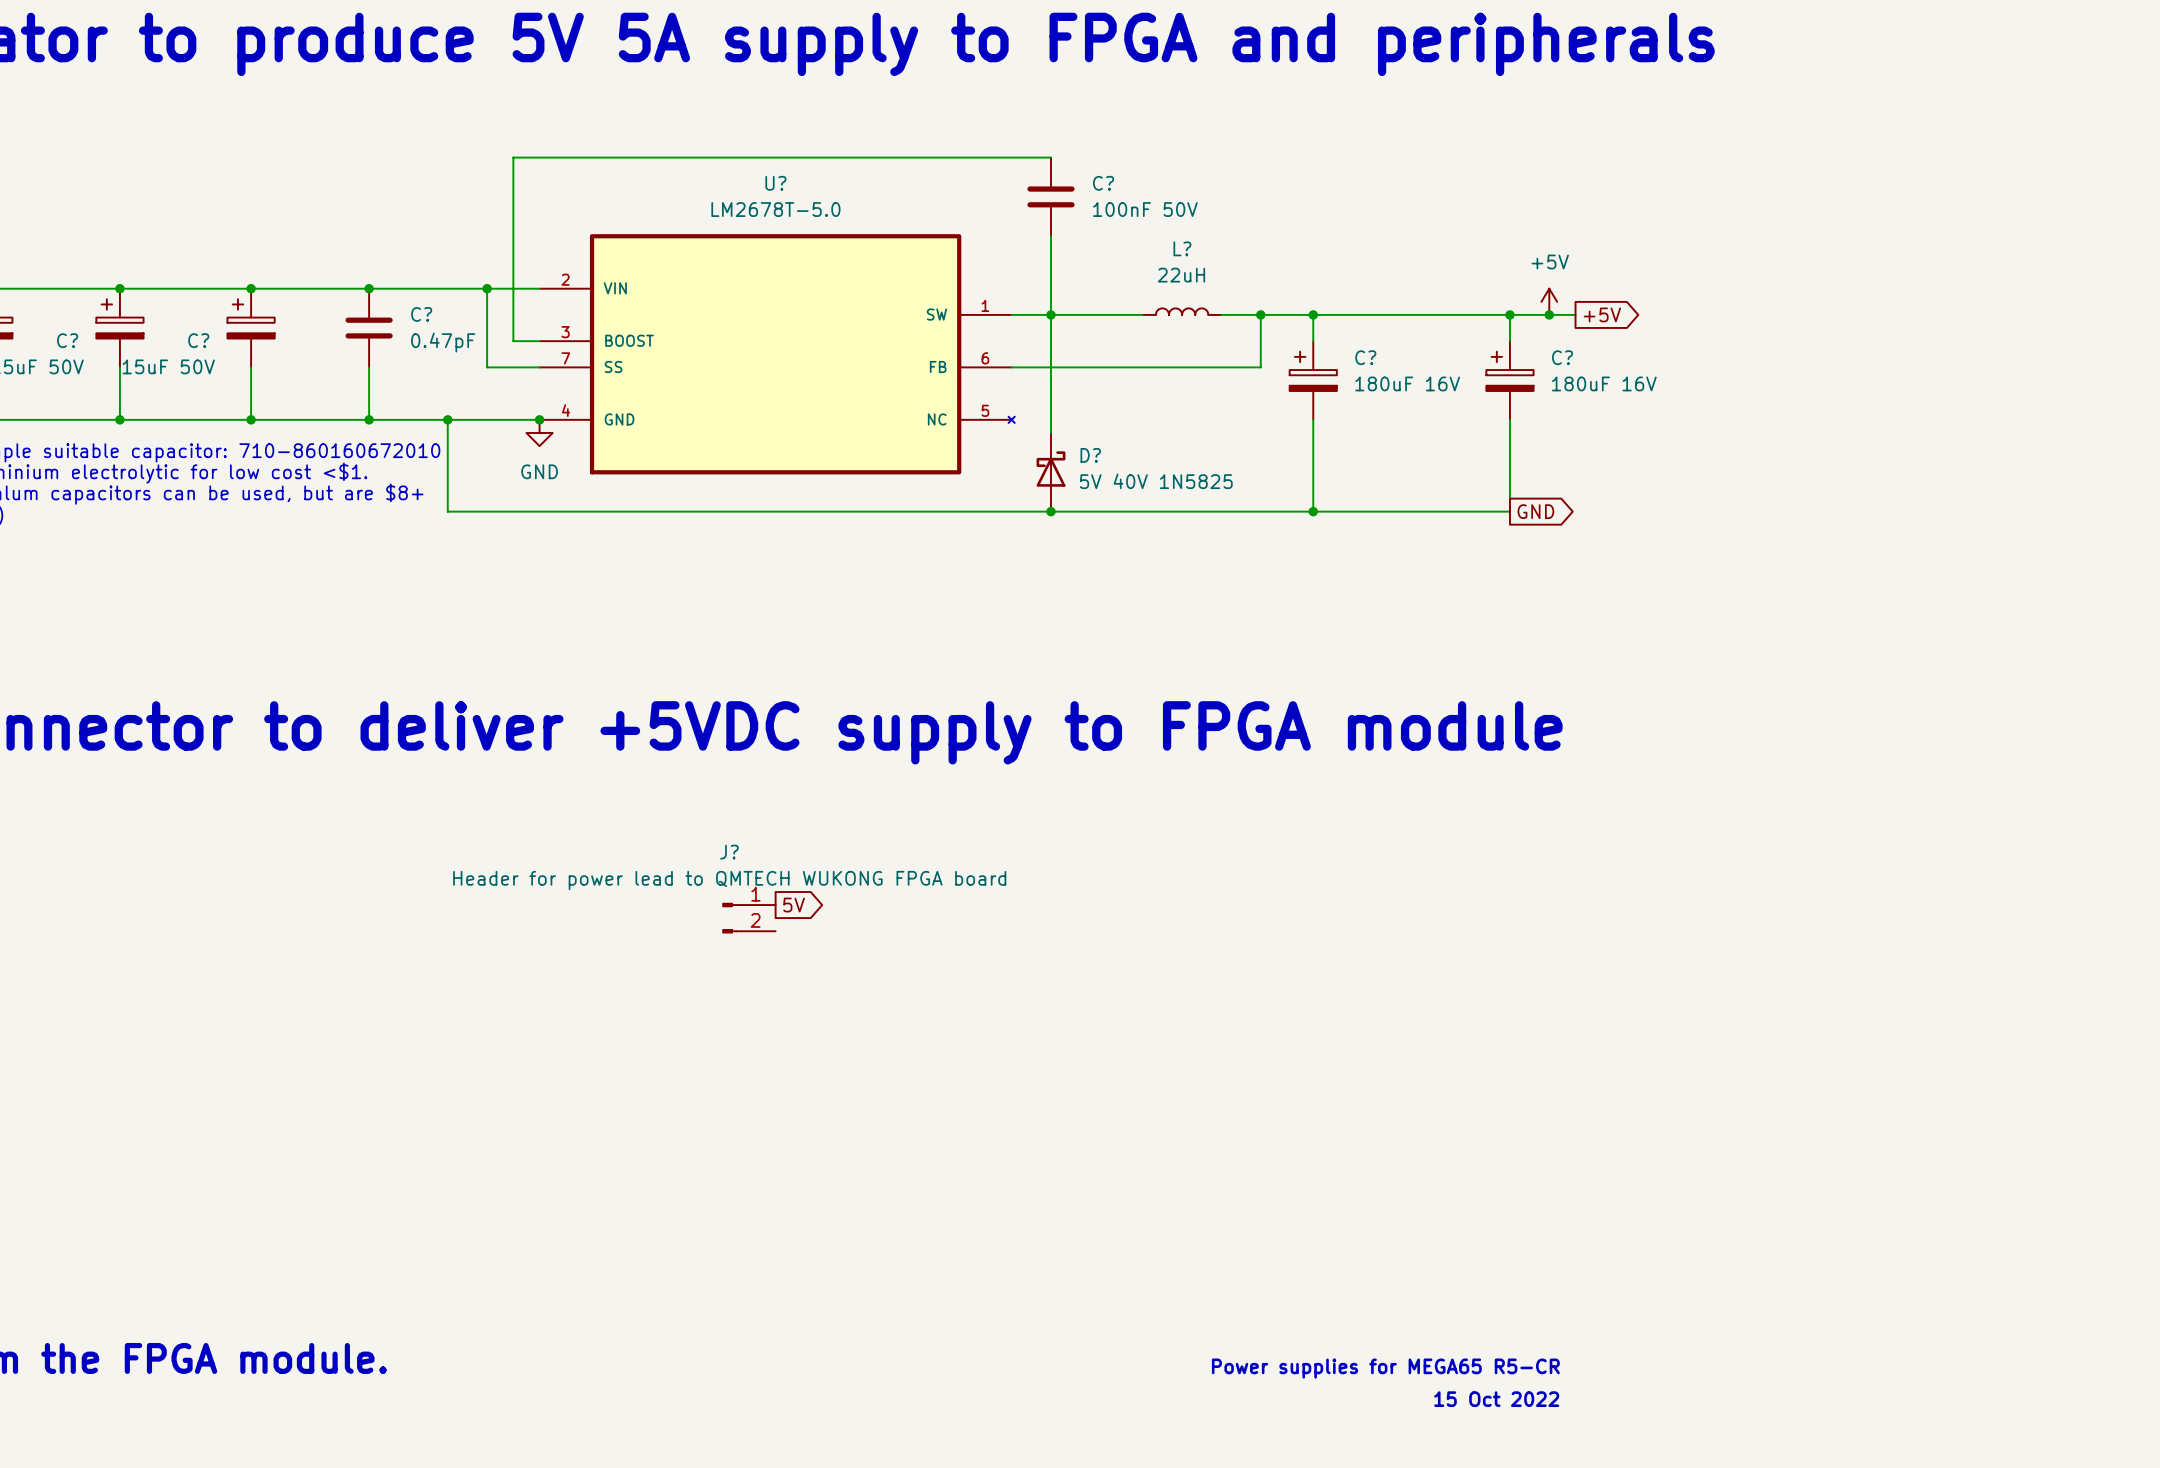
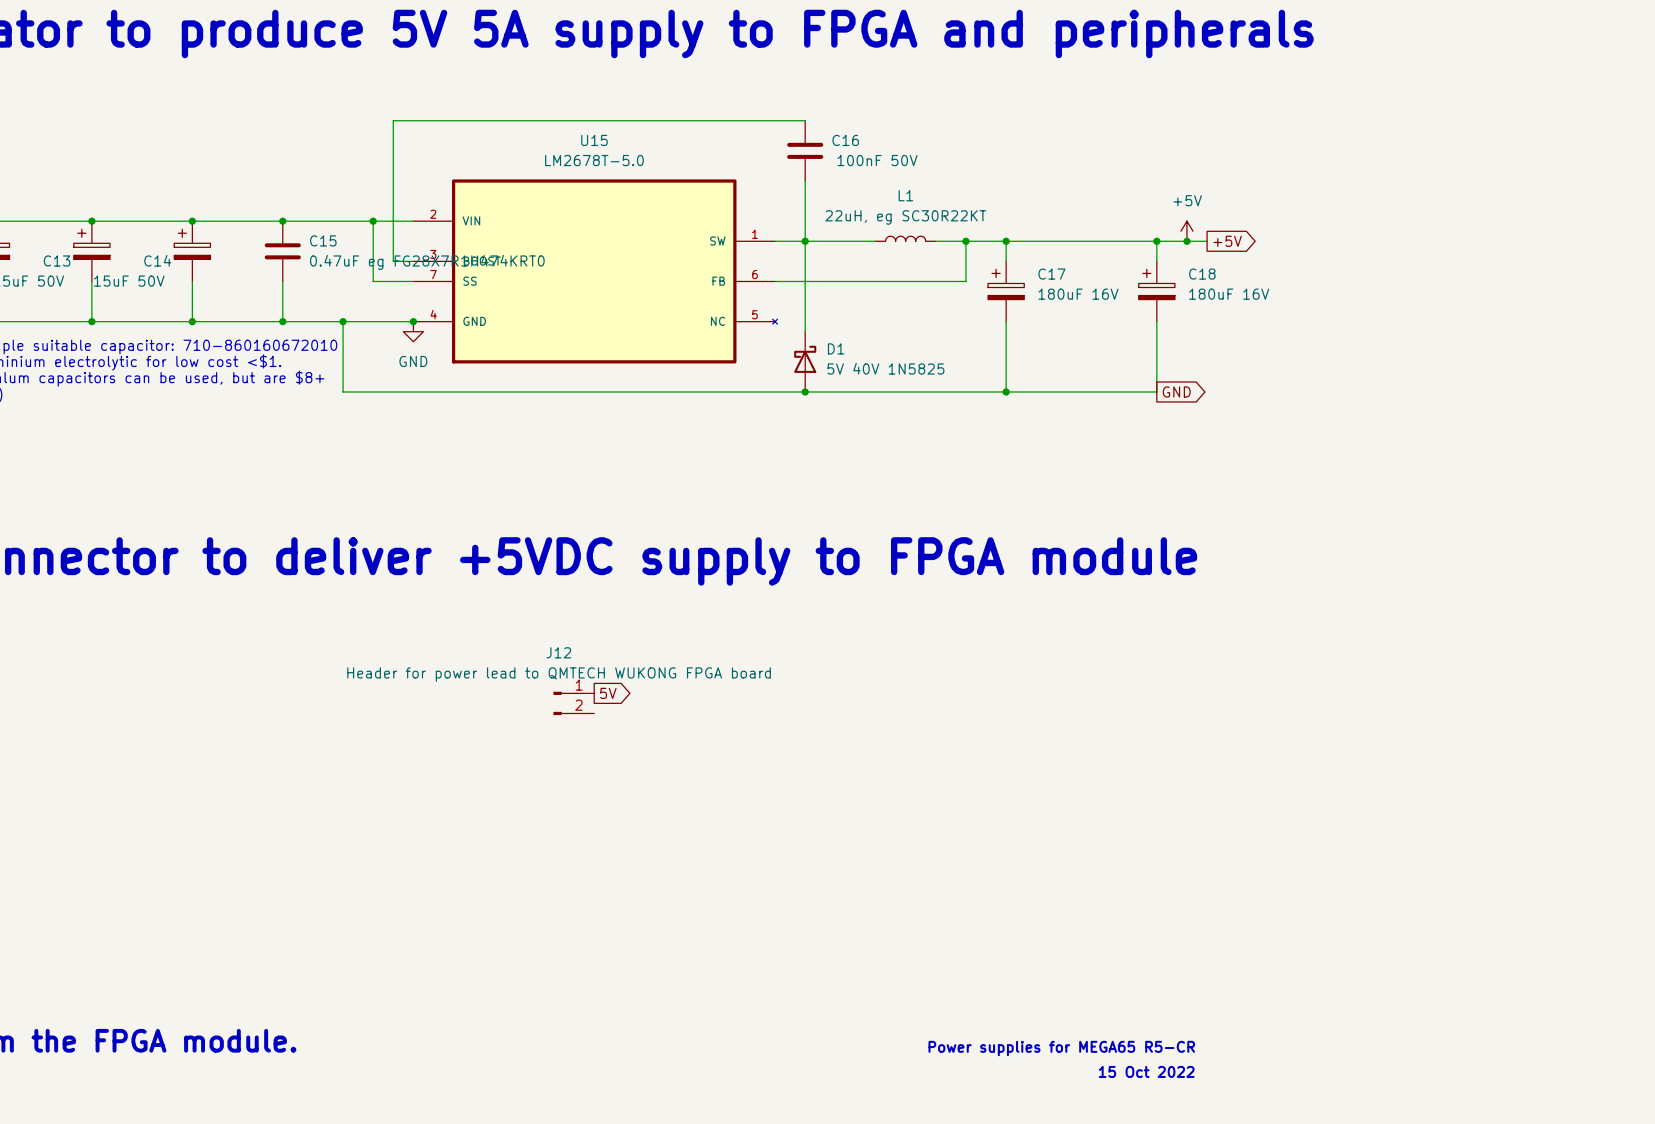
U? name: U? (775, 183) -> U15 (594, 140)
C? name: C? (1103, 183) -> C16 (845, 140)
L? name: L? (1182, 248) -> L1 (905, 195)
L? value: 22uH (1181, 275) -> 22uH, eg SC30R22KT (905, 217)
C? name: C? (421, 314) -> C15 (323, 240)
C? name: C? (67, 340) -> C13 (57, 261)
C? name: C? (198, 340) -> C14 (157, 260)
C? value: 0.47pF (443, 342) -> 0.47uF eg FG28X7R1H474KRT0 (427, 262)
C? name: C? (1365, 357) -> C17 (1051, 274)
C? name: C? (1562, 357) -> C18 (1202, 274)
D? name: D? (1090, 455) -> D1 (836, 348)
J? name: J? (729, 852) -> J12 (558, 652)

